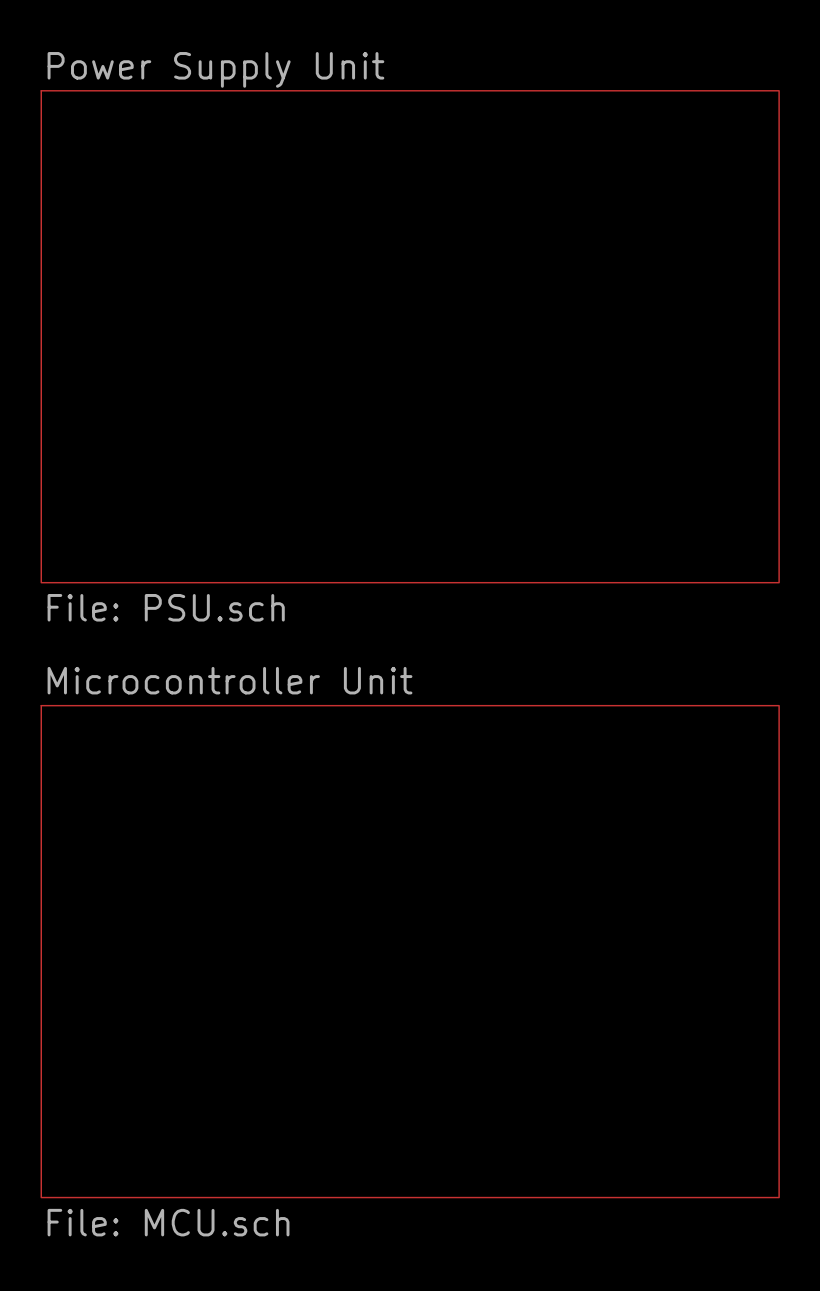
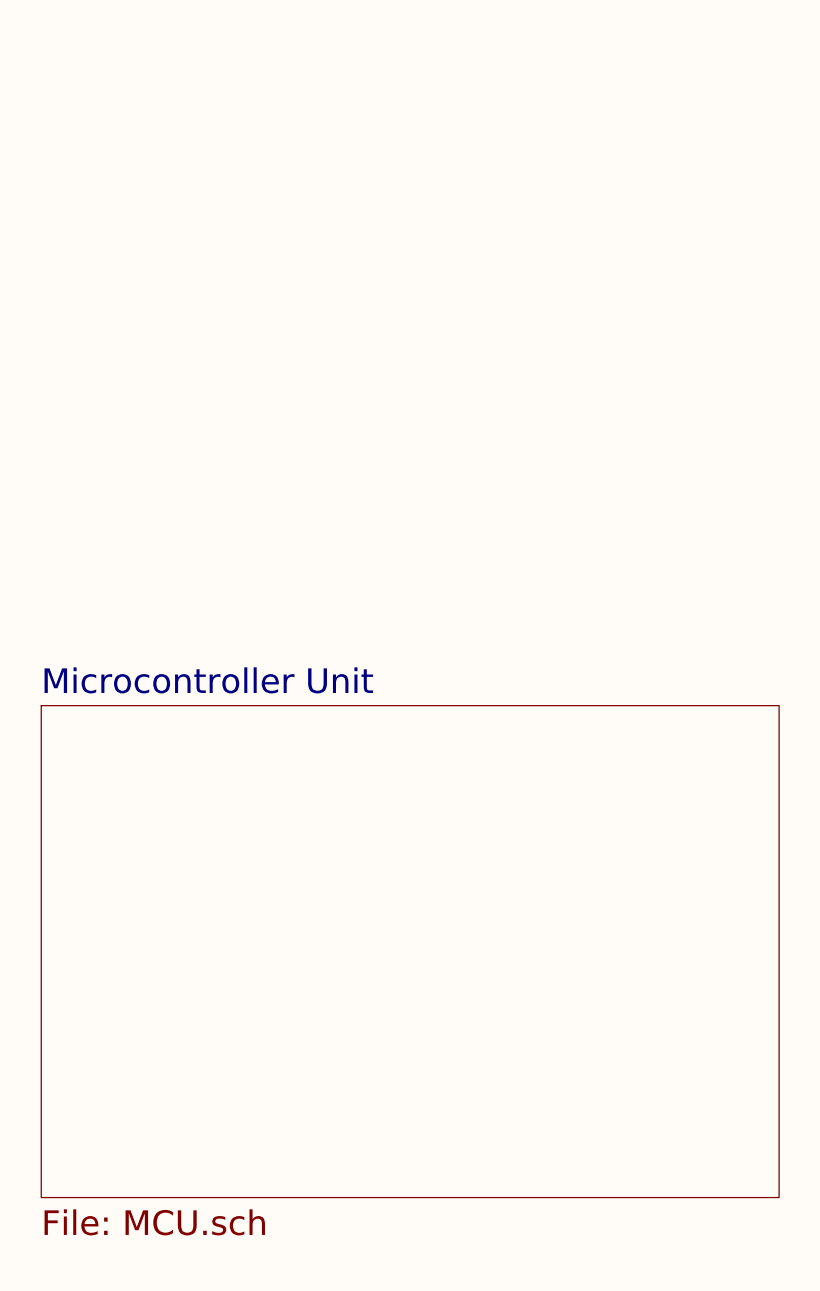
sheet Power Supply Unit: File: PSU.sch (410, 336) -> none

